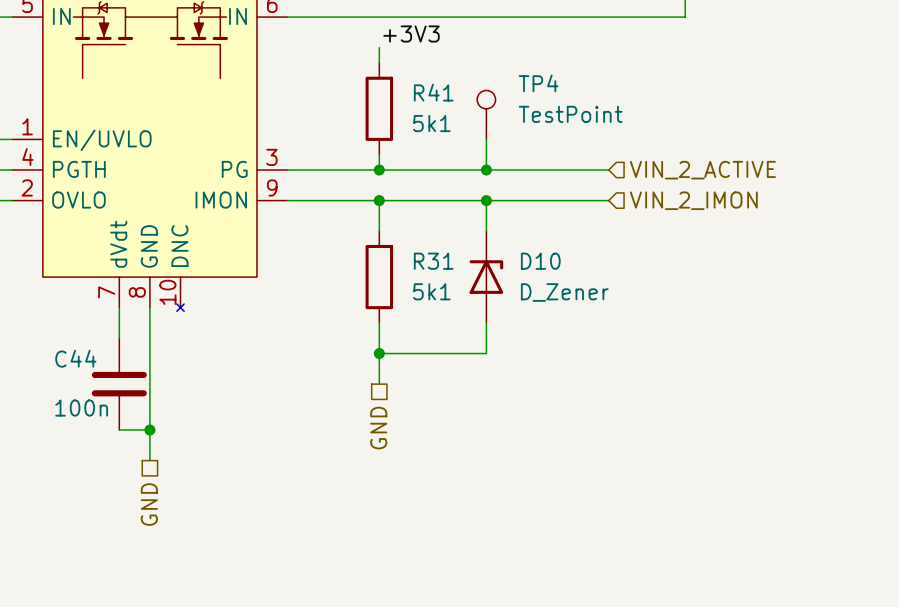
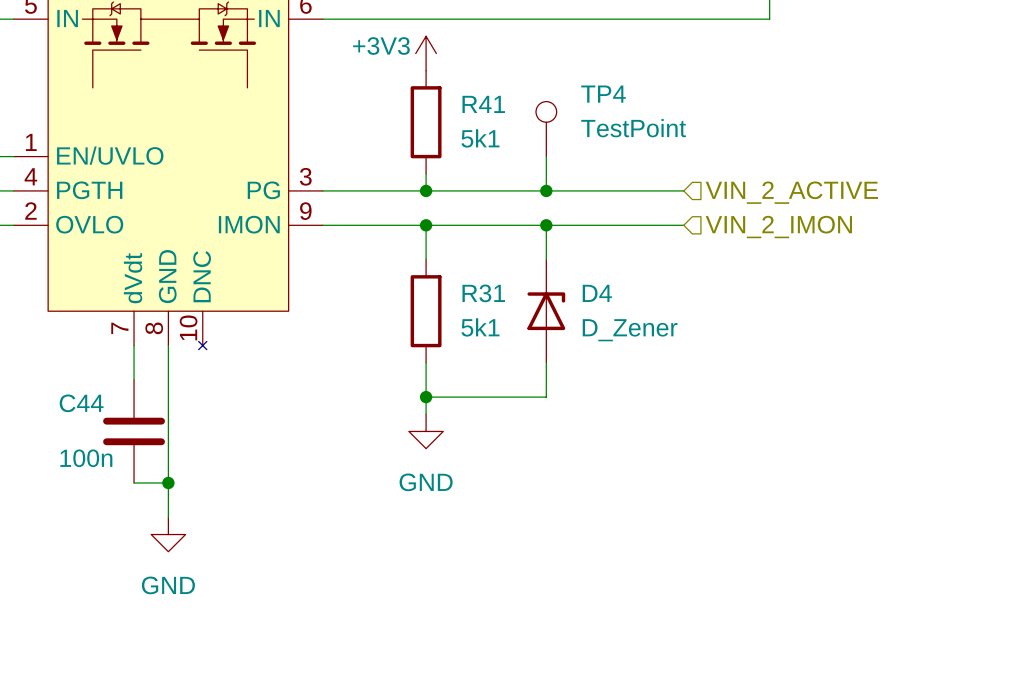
label: +3V3 (411, 34) -> none
power symbol: none -> +3V3 (426, 53)
D10 name: D10 (540, 261) -> D4 (597, 293)
power symbol: none -> GND (426, 431)
hierarchical label: GND (378, 428) -> none
power symbol: none -> GND (168, 534)
hierarchical label: GND (149, 504) -> none

